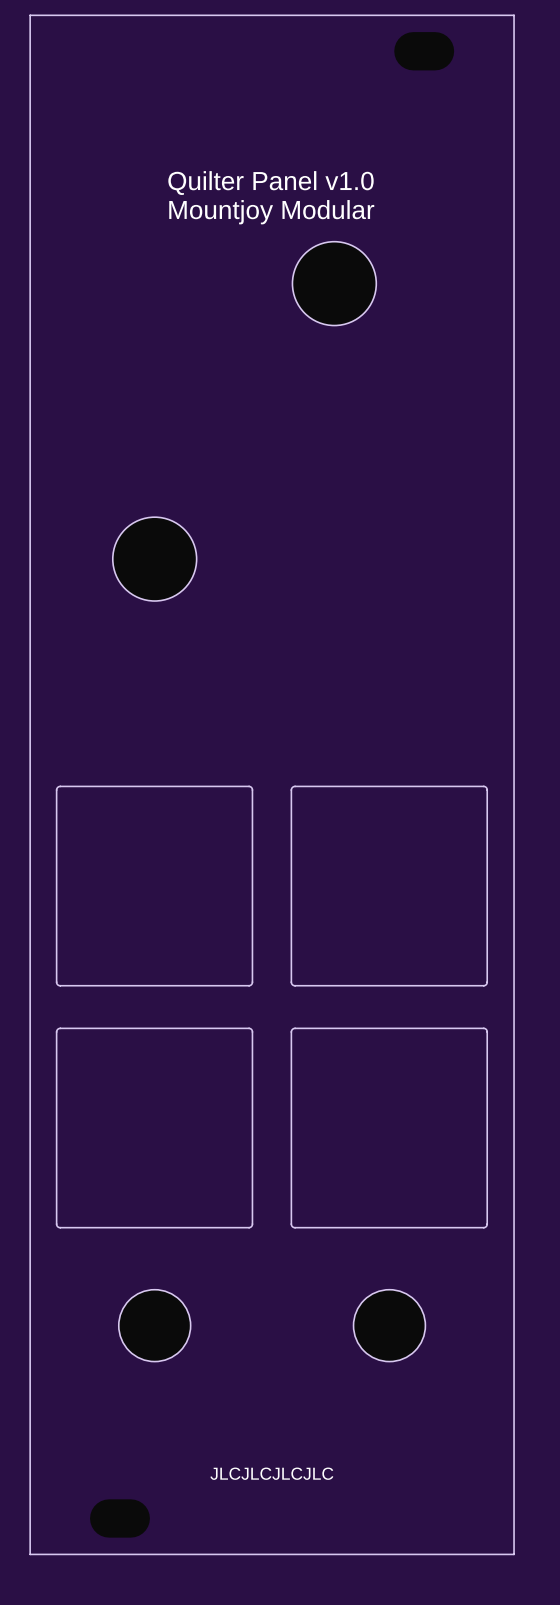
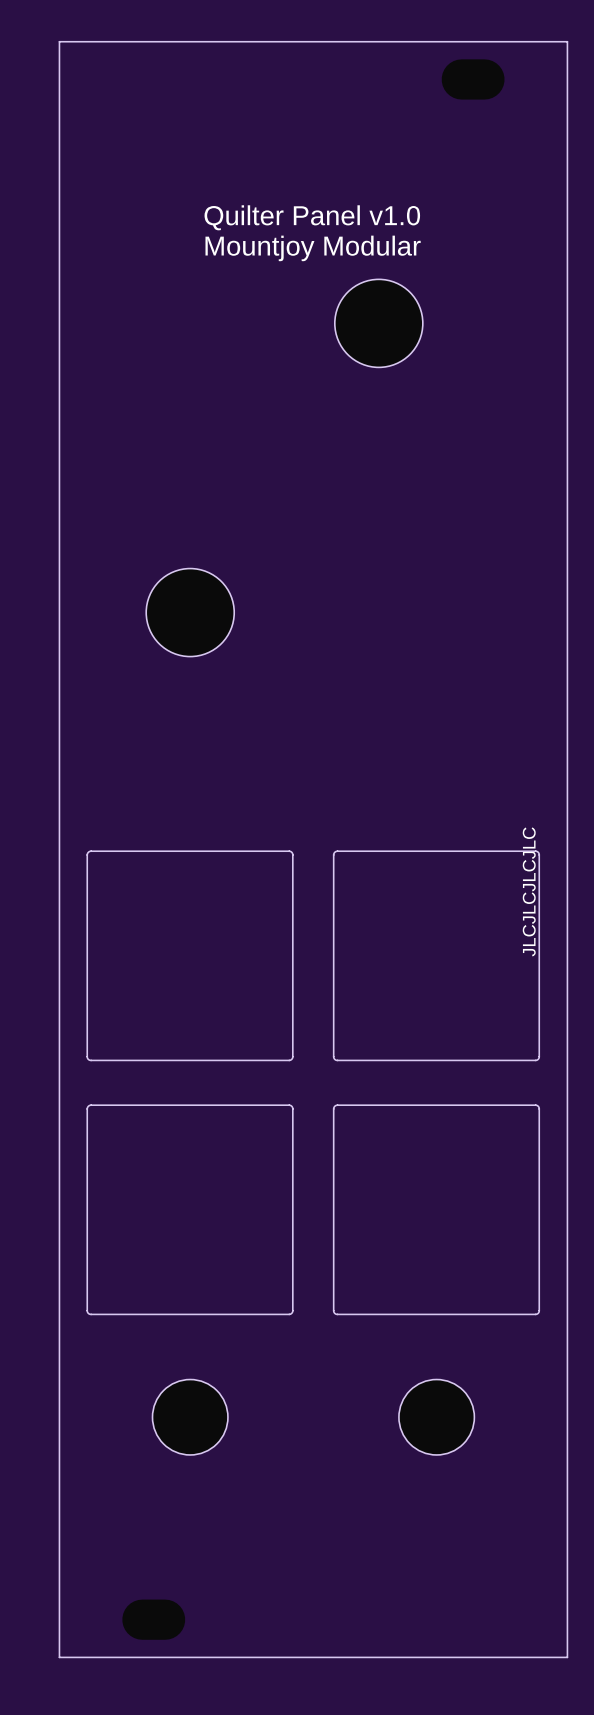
text: none -> JLCJLCJLCJLC (529, 891)
text: JLCJLCJLCJLC (271, 1473) -> none

